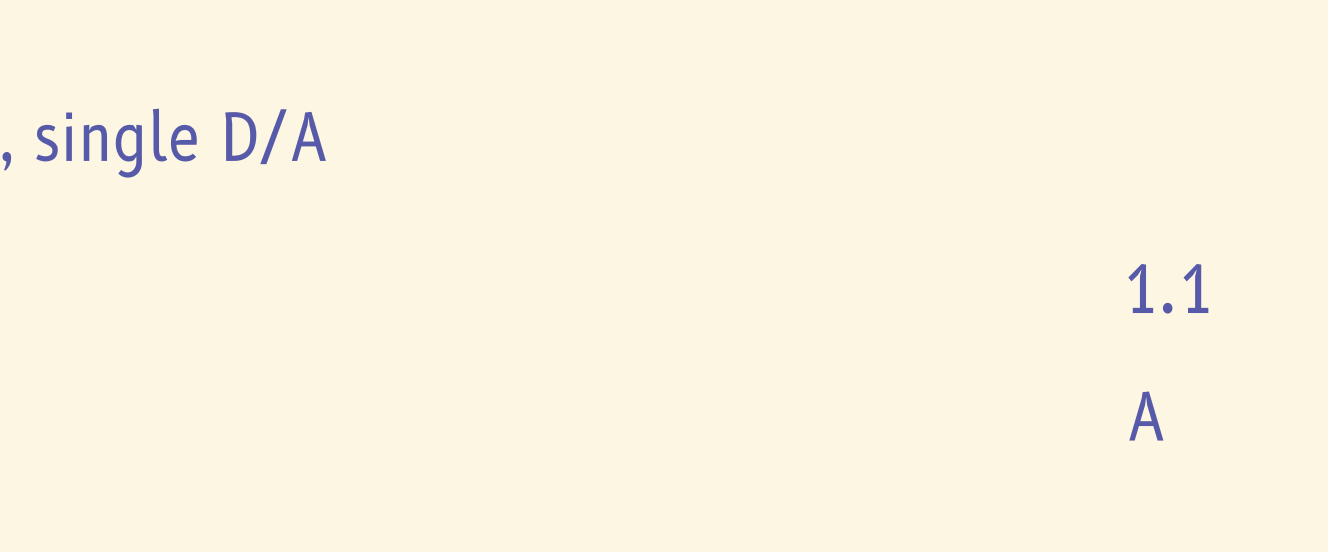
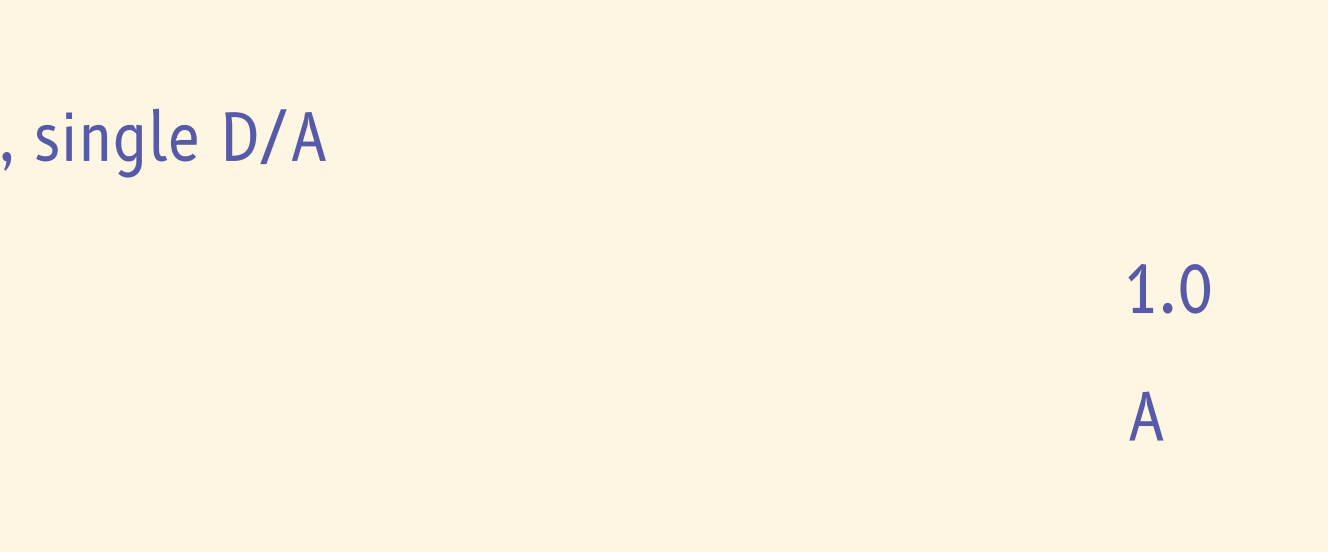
text: 1.1 (1168, 288) -> 1.0 (1169, 288)

